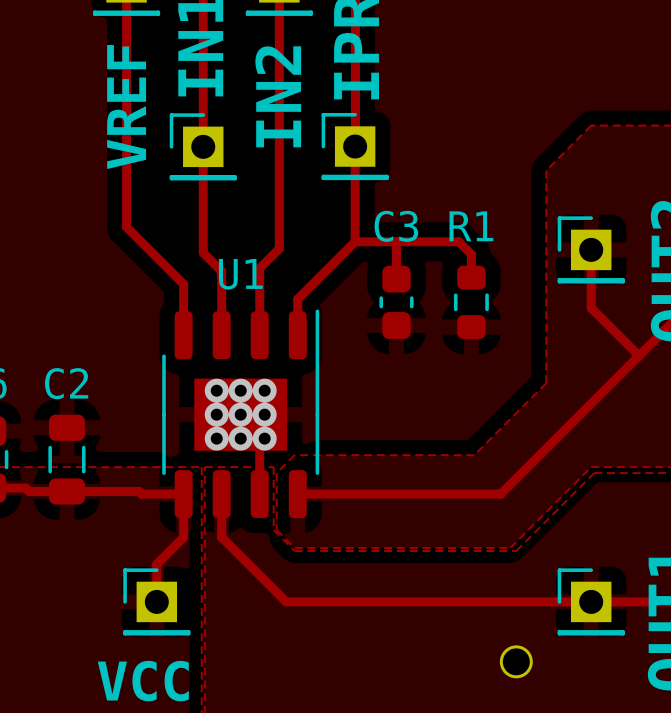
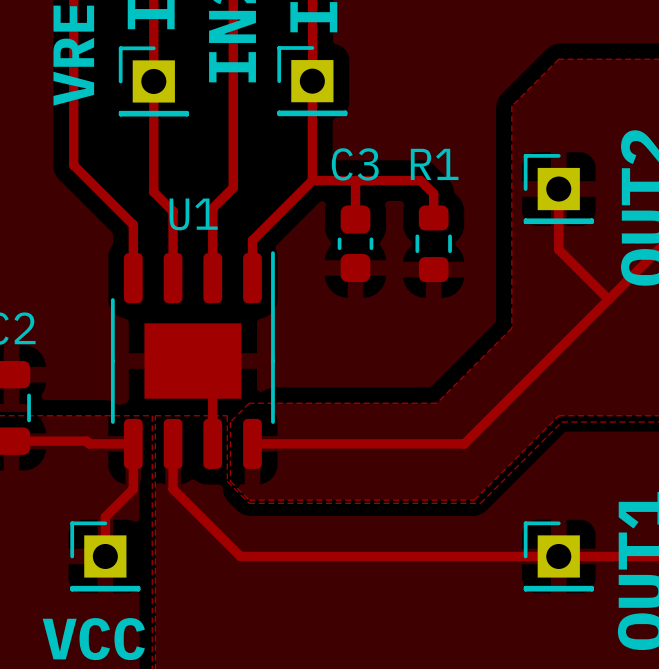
via: (216, 390) -> none
via: (240, 390) -> none
via: (264, 390) -> none
via: (216, 414) -> none
via: (240, 414) -> none
via: (264, 414) -> none
via: (216, 438) -> none
via: (240, 438) -> none
via: (264, 438) -> none
round board edge: [499, 645, 533, 679] -> none

